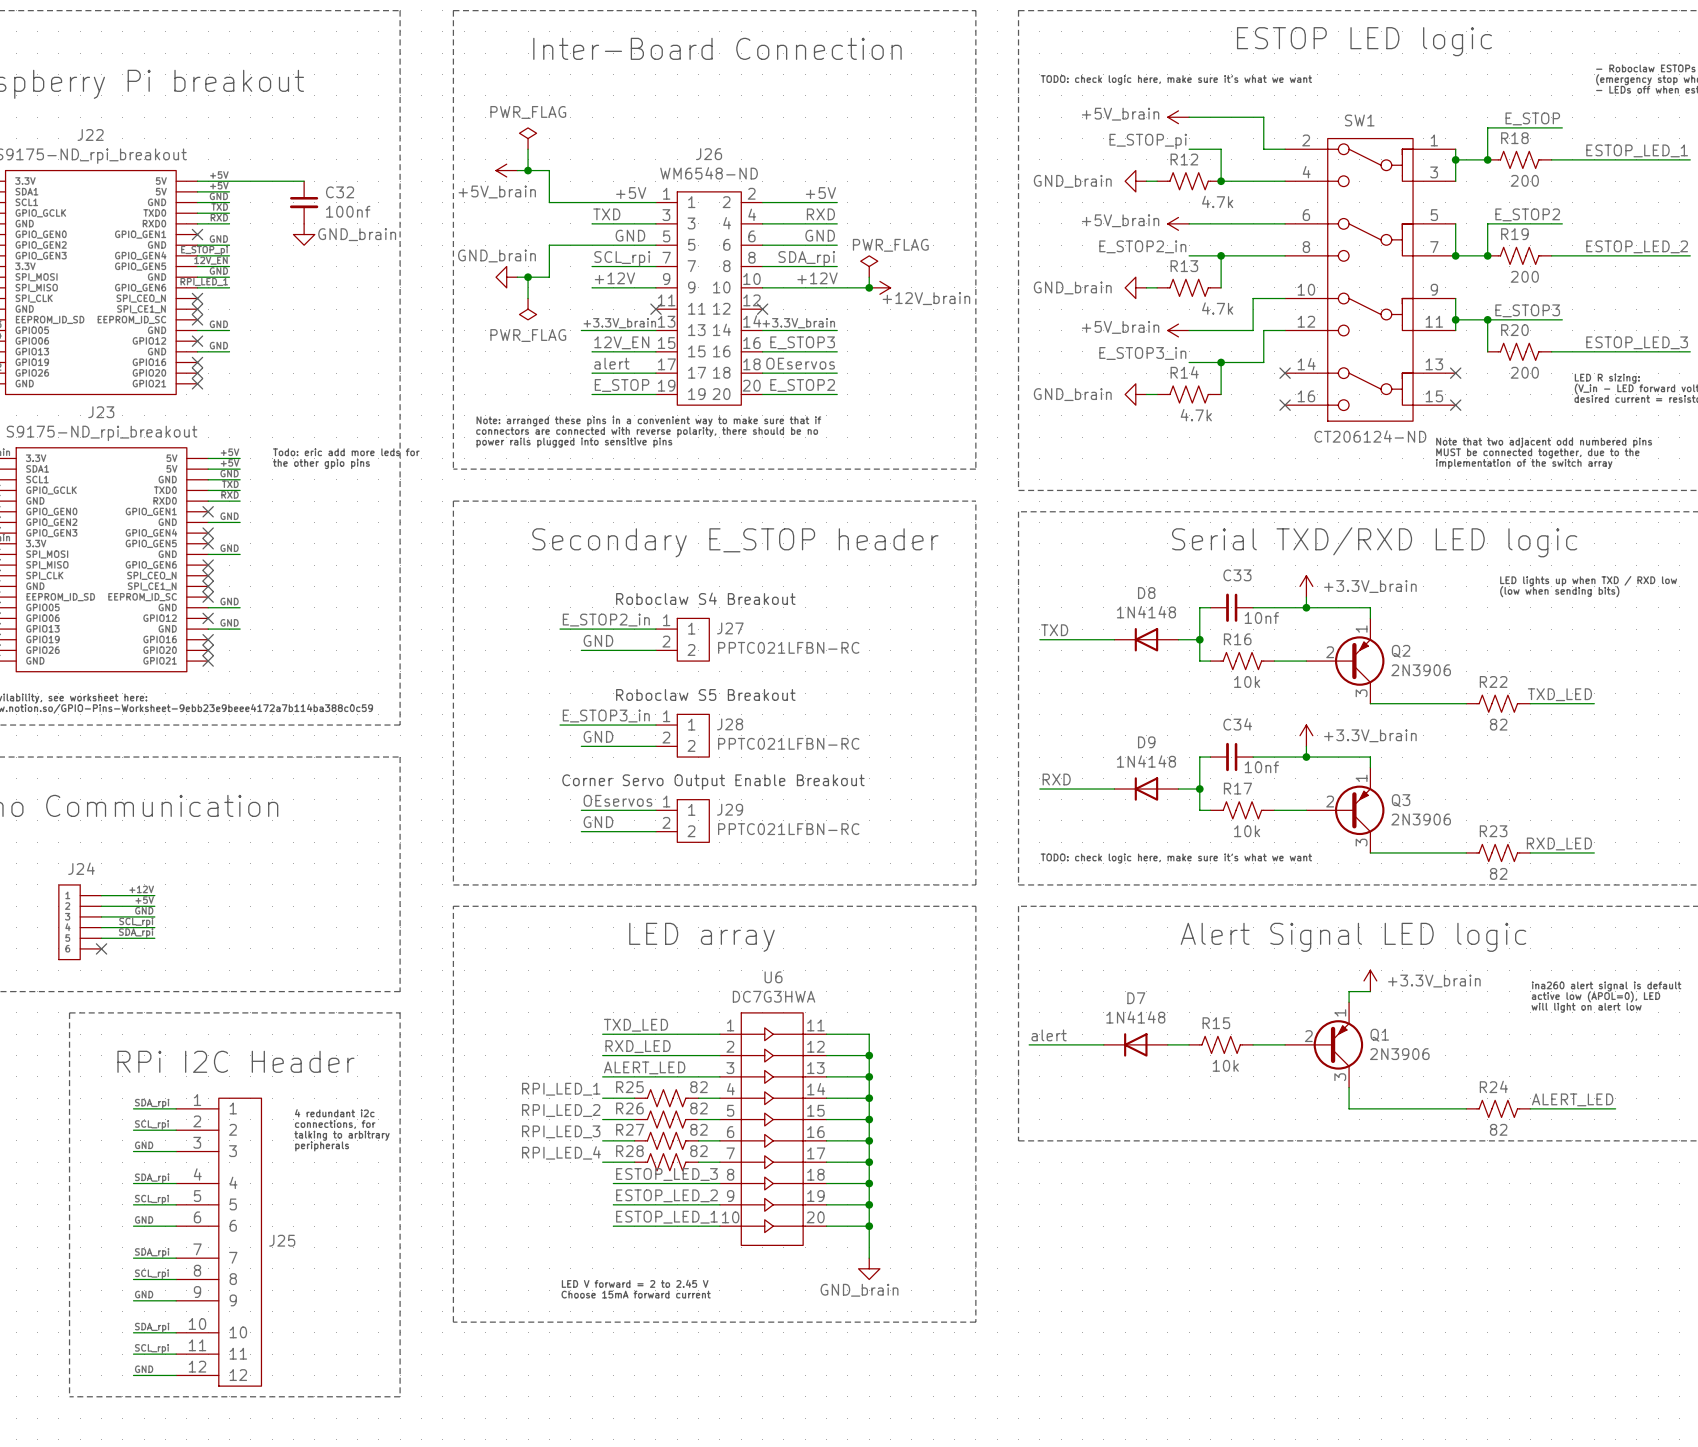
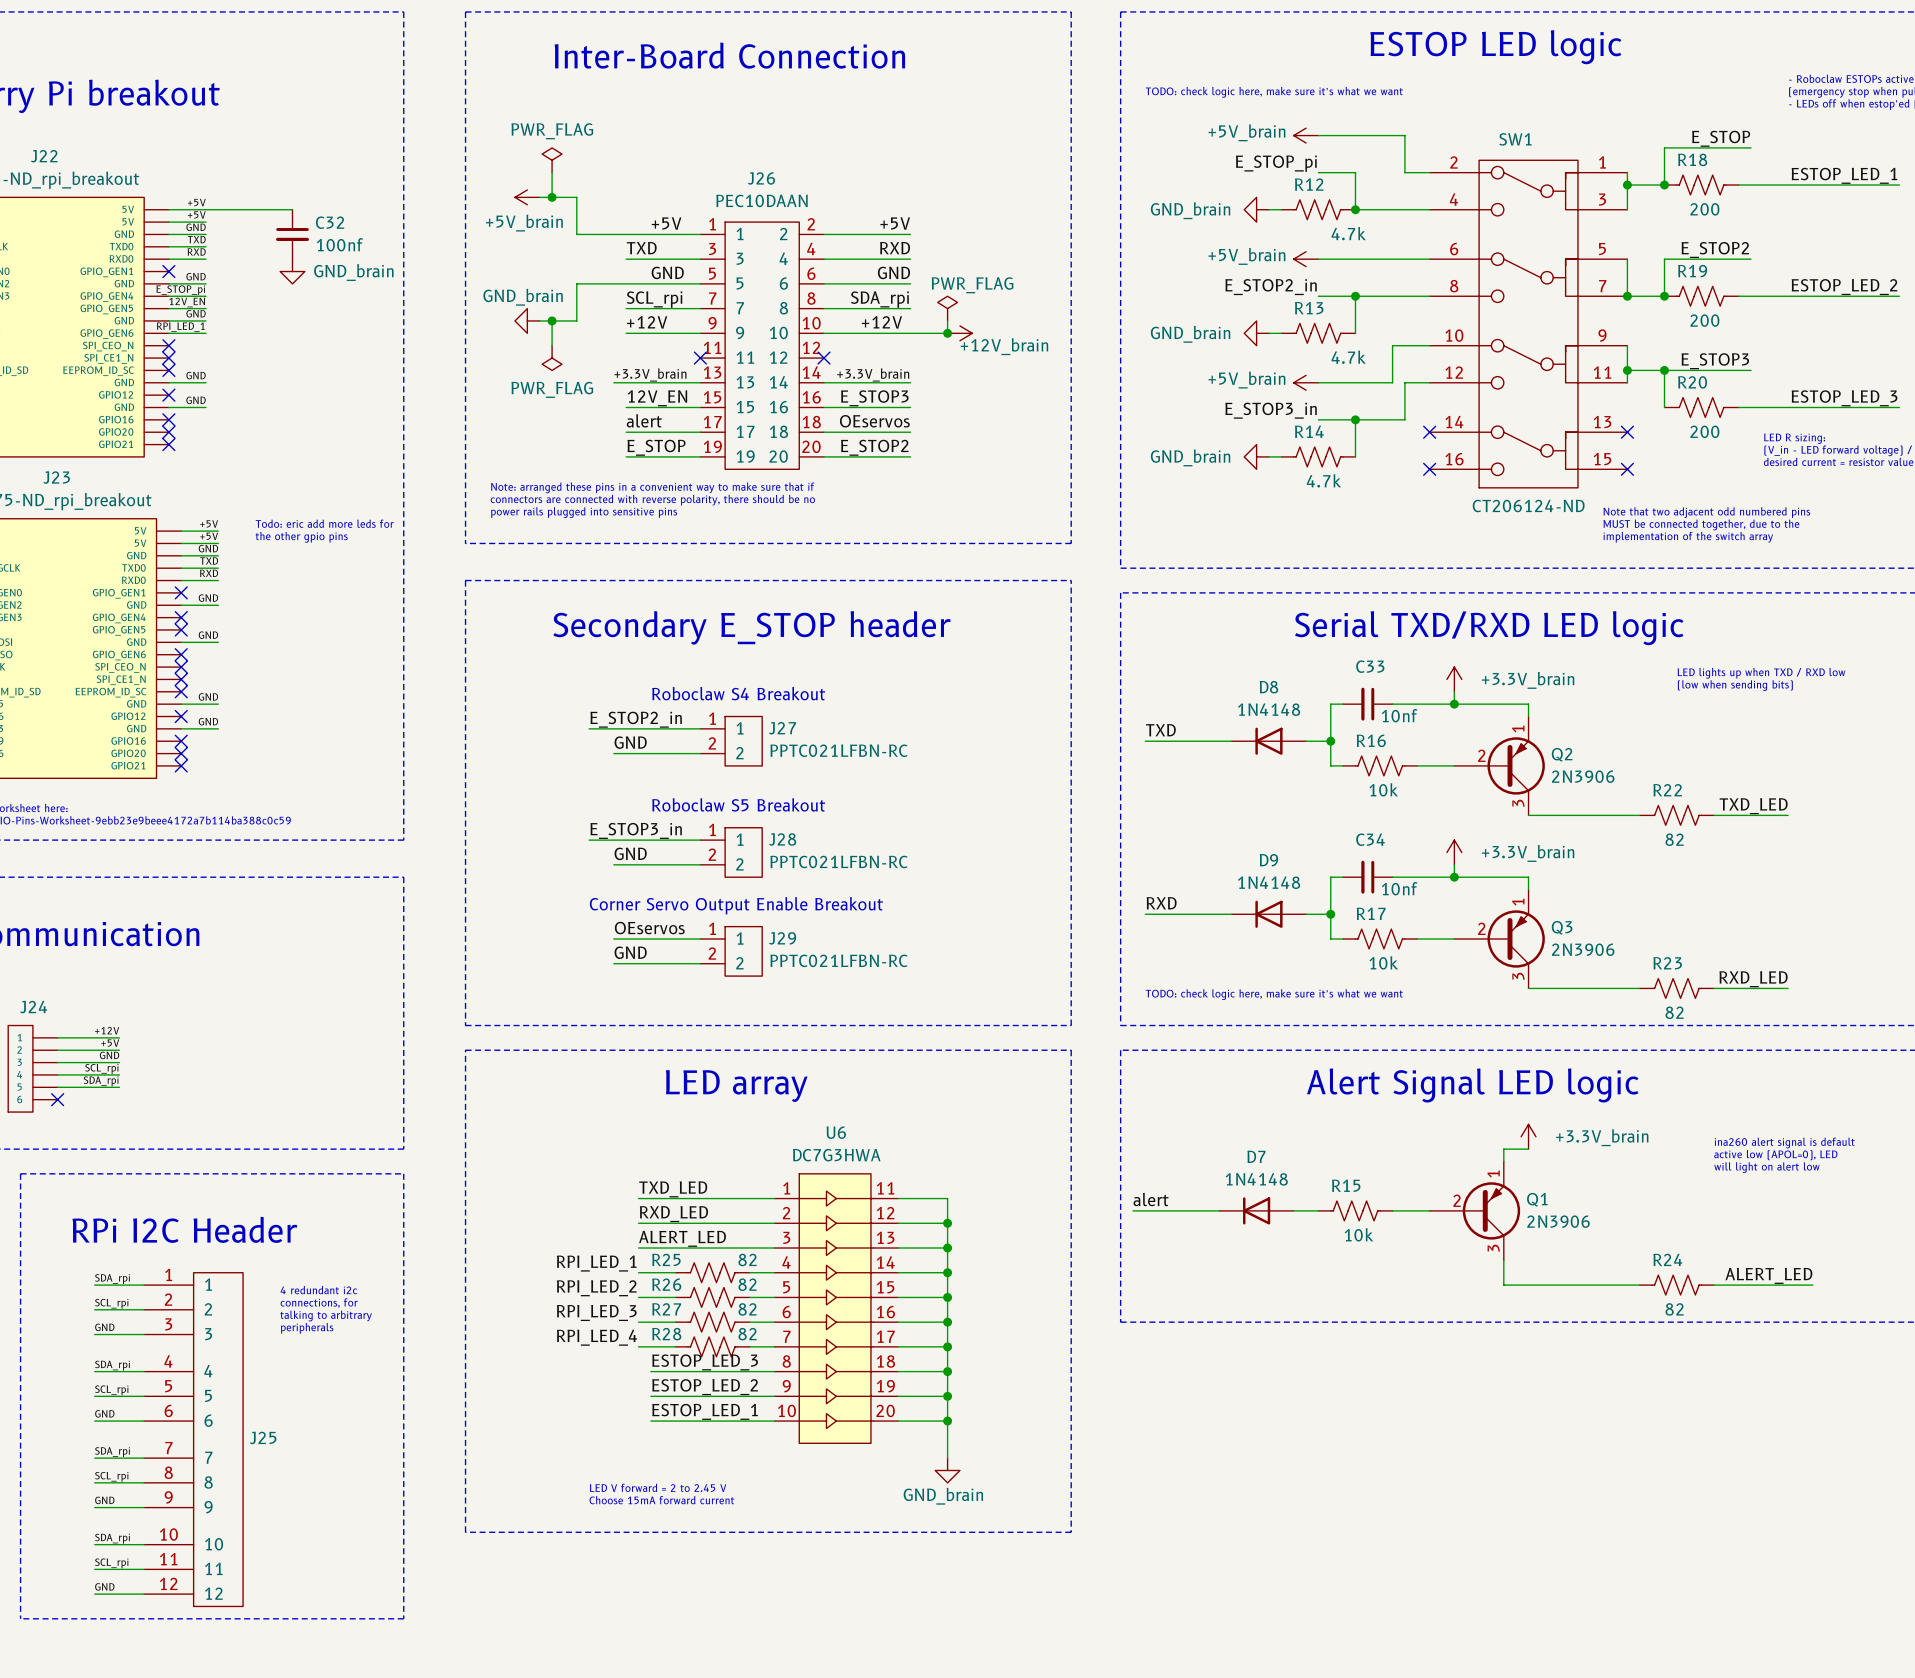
J26 value: WM6548-ND (709, 173) -> PEC10DAAN (761, 200)

